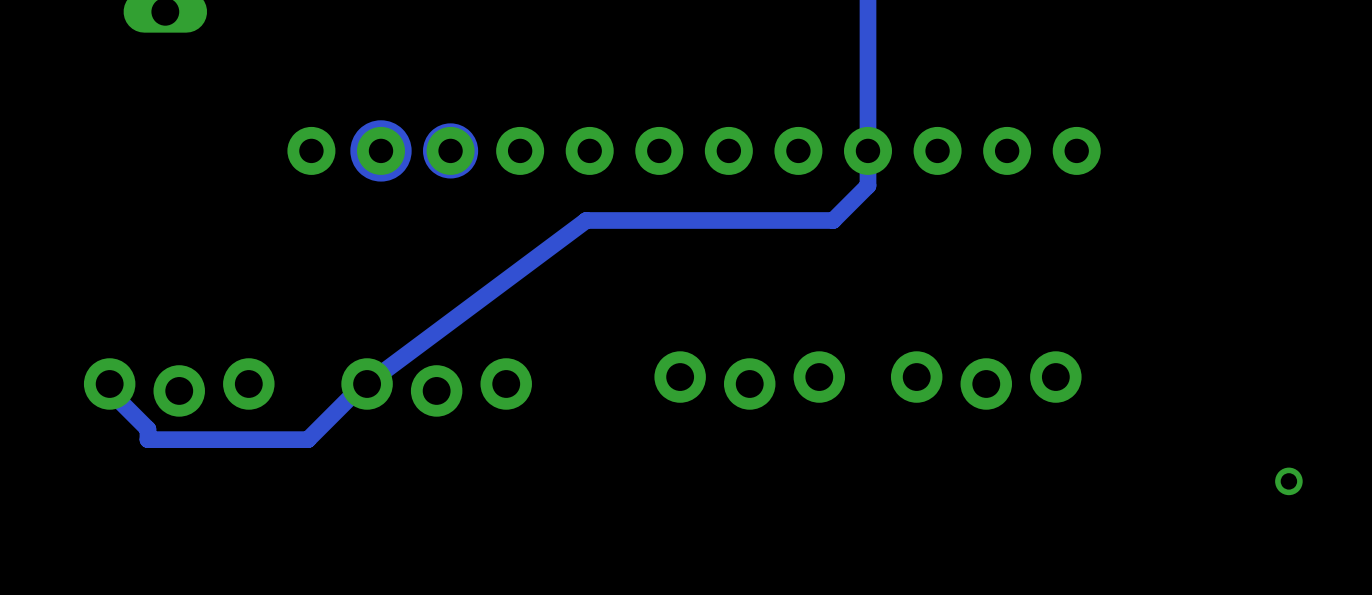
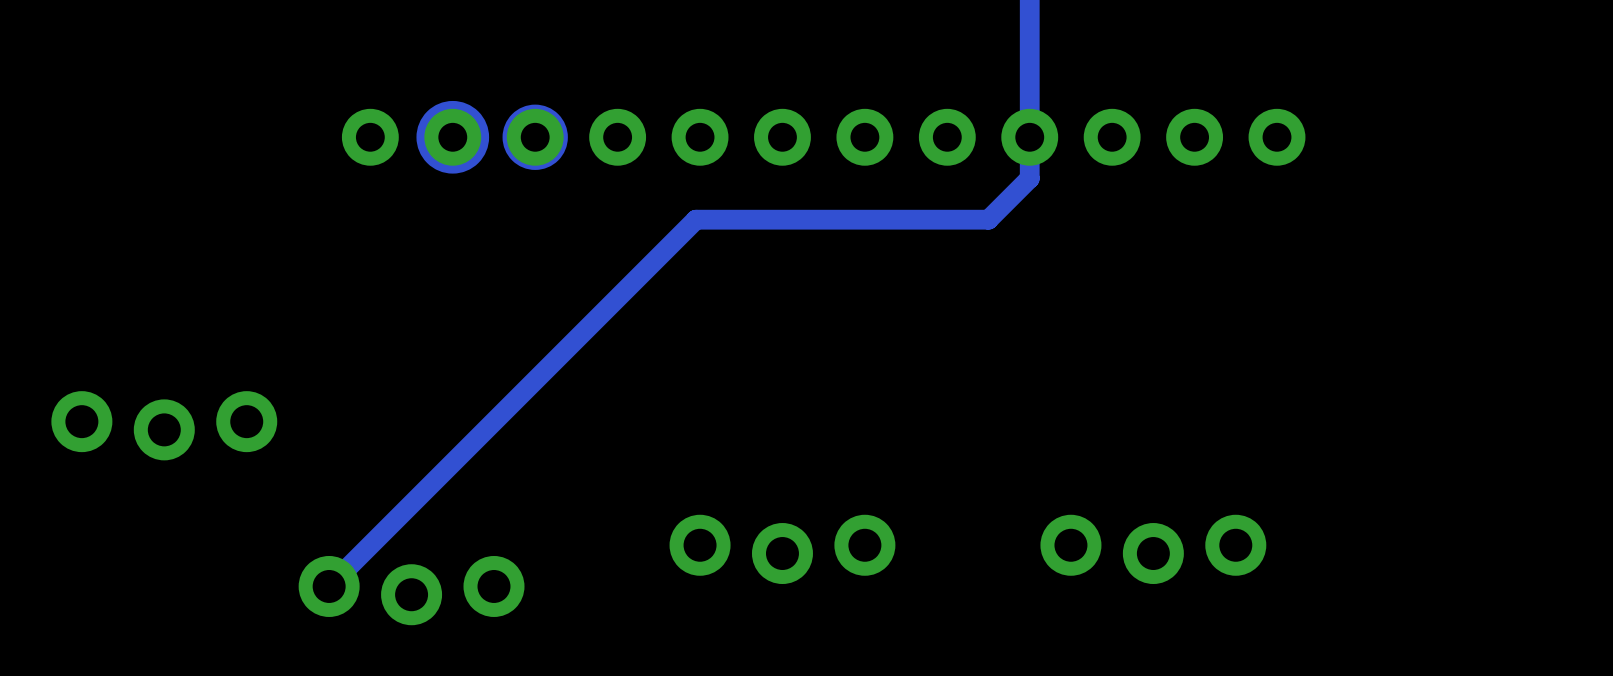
track: (586, 220) (367, 383) (363, 383) (307, 439) (147, 439) (147, 429) (106, 387) (109, 383) -> (695, 219) (329, 586)
part: (749, 380) -> none
part position: (986, 380) -> (1153, 549)
part position: (179, 387) -> (164, 425)
part: (436, 387) -> none
via: (1288, 481) -> none
part: none -> (782, 549)
part: none -> (411, 590)

